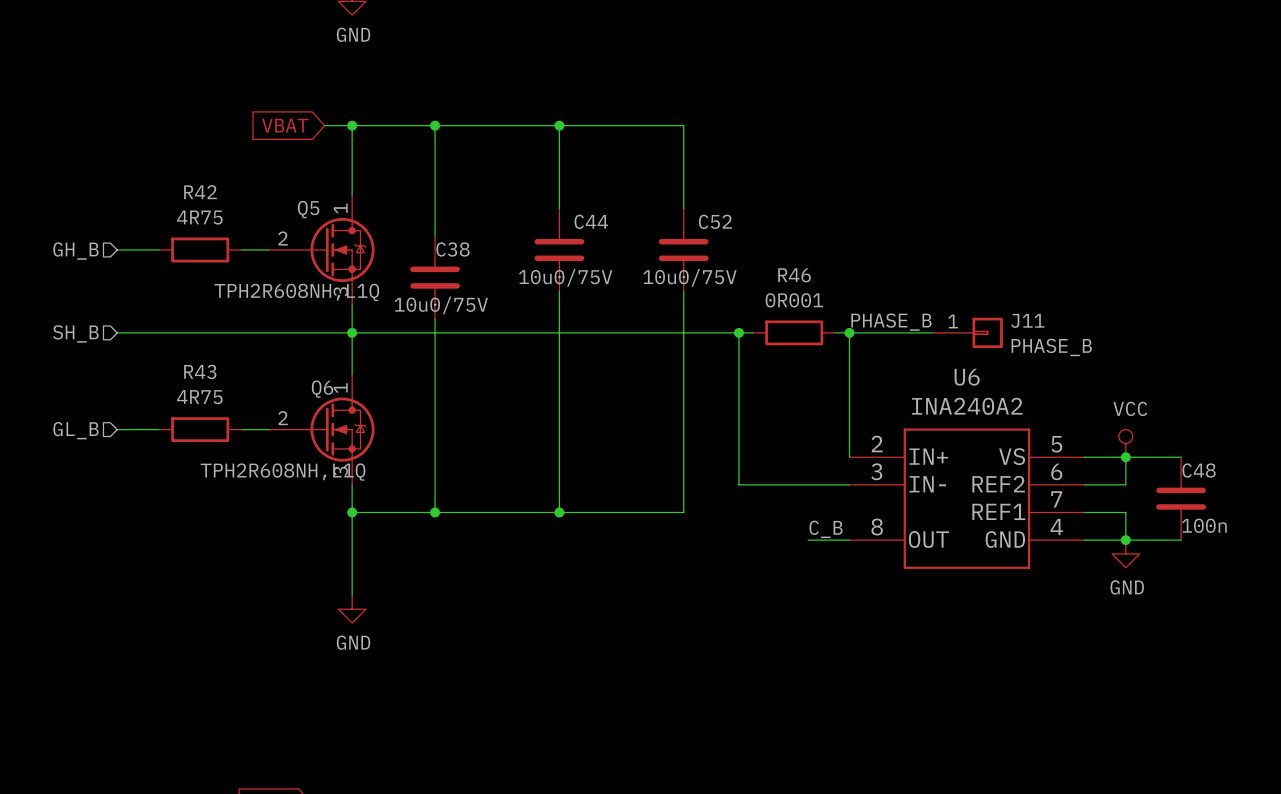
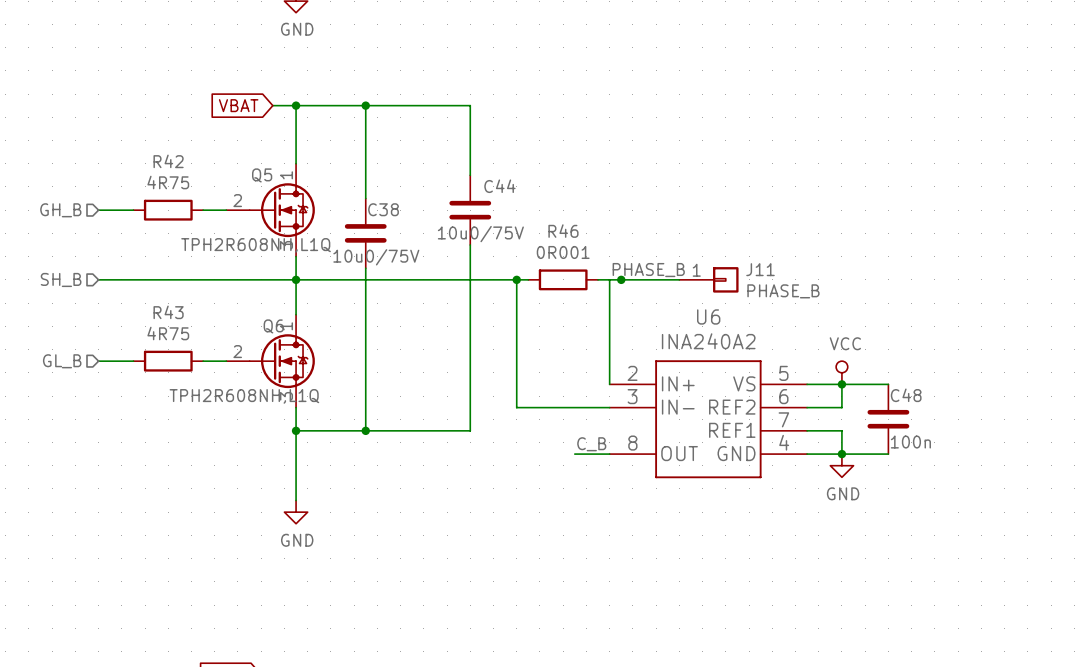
wire: (559, 125) (683, 125) (683, 208) -> none
junction: (559, 125) -> none
C52: 10u0/75V (683, 250) -> none
wire: (683, 291) (683, 512) (559, 512) -> none
label position: PHASE_B (891, 322) -> PHASE_B (648, 270)
junction: none -> (516, 279)
wire: (628, 332) (711, 332) -> none
wire: (739, 332) (739, 484) (849, 484) -> (516, 279) (516, 407) (609, 407)
wire: none -> (632, 279) (679, 279)
R46 position: (794, 332) -> (563, 279)
wire: (835, 332) (932, 332) -> none
wire: (849, 332) (849, 457) -> (609, 279) (609, 384)
junction: (849, 332) -> none
J11 position: (967, 332) -> (708, 279)
power symbol position: VCC (1125, 443) -> VCC (841, 372)
junction: none -> (841, 384)
wire: (1084, 457) (1181, 457) -> (807, 384) (888, 384)
wire: (1125, 457) (1125, 484) (1084, 484) -> (841, 384) (841, 407) (807, 407)
junction: (1125, 457) -> none
U6 position: (966, 498) -> (708, 419)
C48 position: (1181, 498) -> (888, 419)
junction: (559, 512) -> none
wire: (1084, 512) (1125, 512) (1125, 540) -> (807, 430) (841, 430) (841, 454)
label position: C_B (826, 529) -> C_B (591, 444)
wire: (808, 540) (849, 540) -> (574, 454) (609, 454)
junction: none -> (841, 454)
wire: (1084, 540) (1181, 540) -> (807, 454) (888, 454)
junction: (1125, 540) -> none
power symbol position: GND (1125, 553) -> GND (841, 465)

